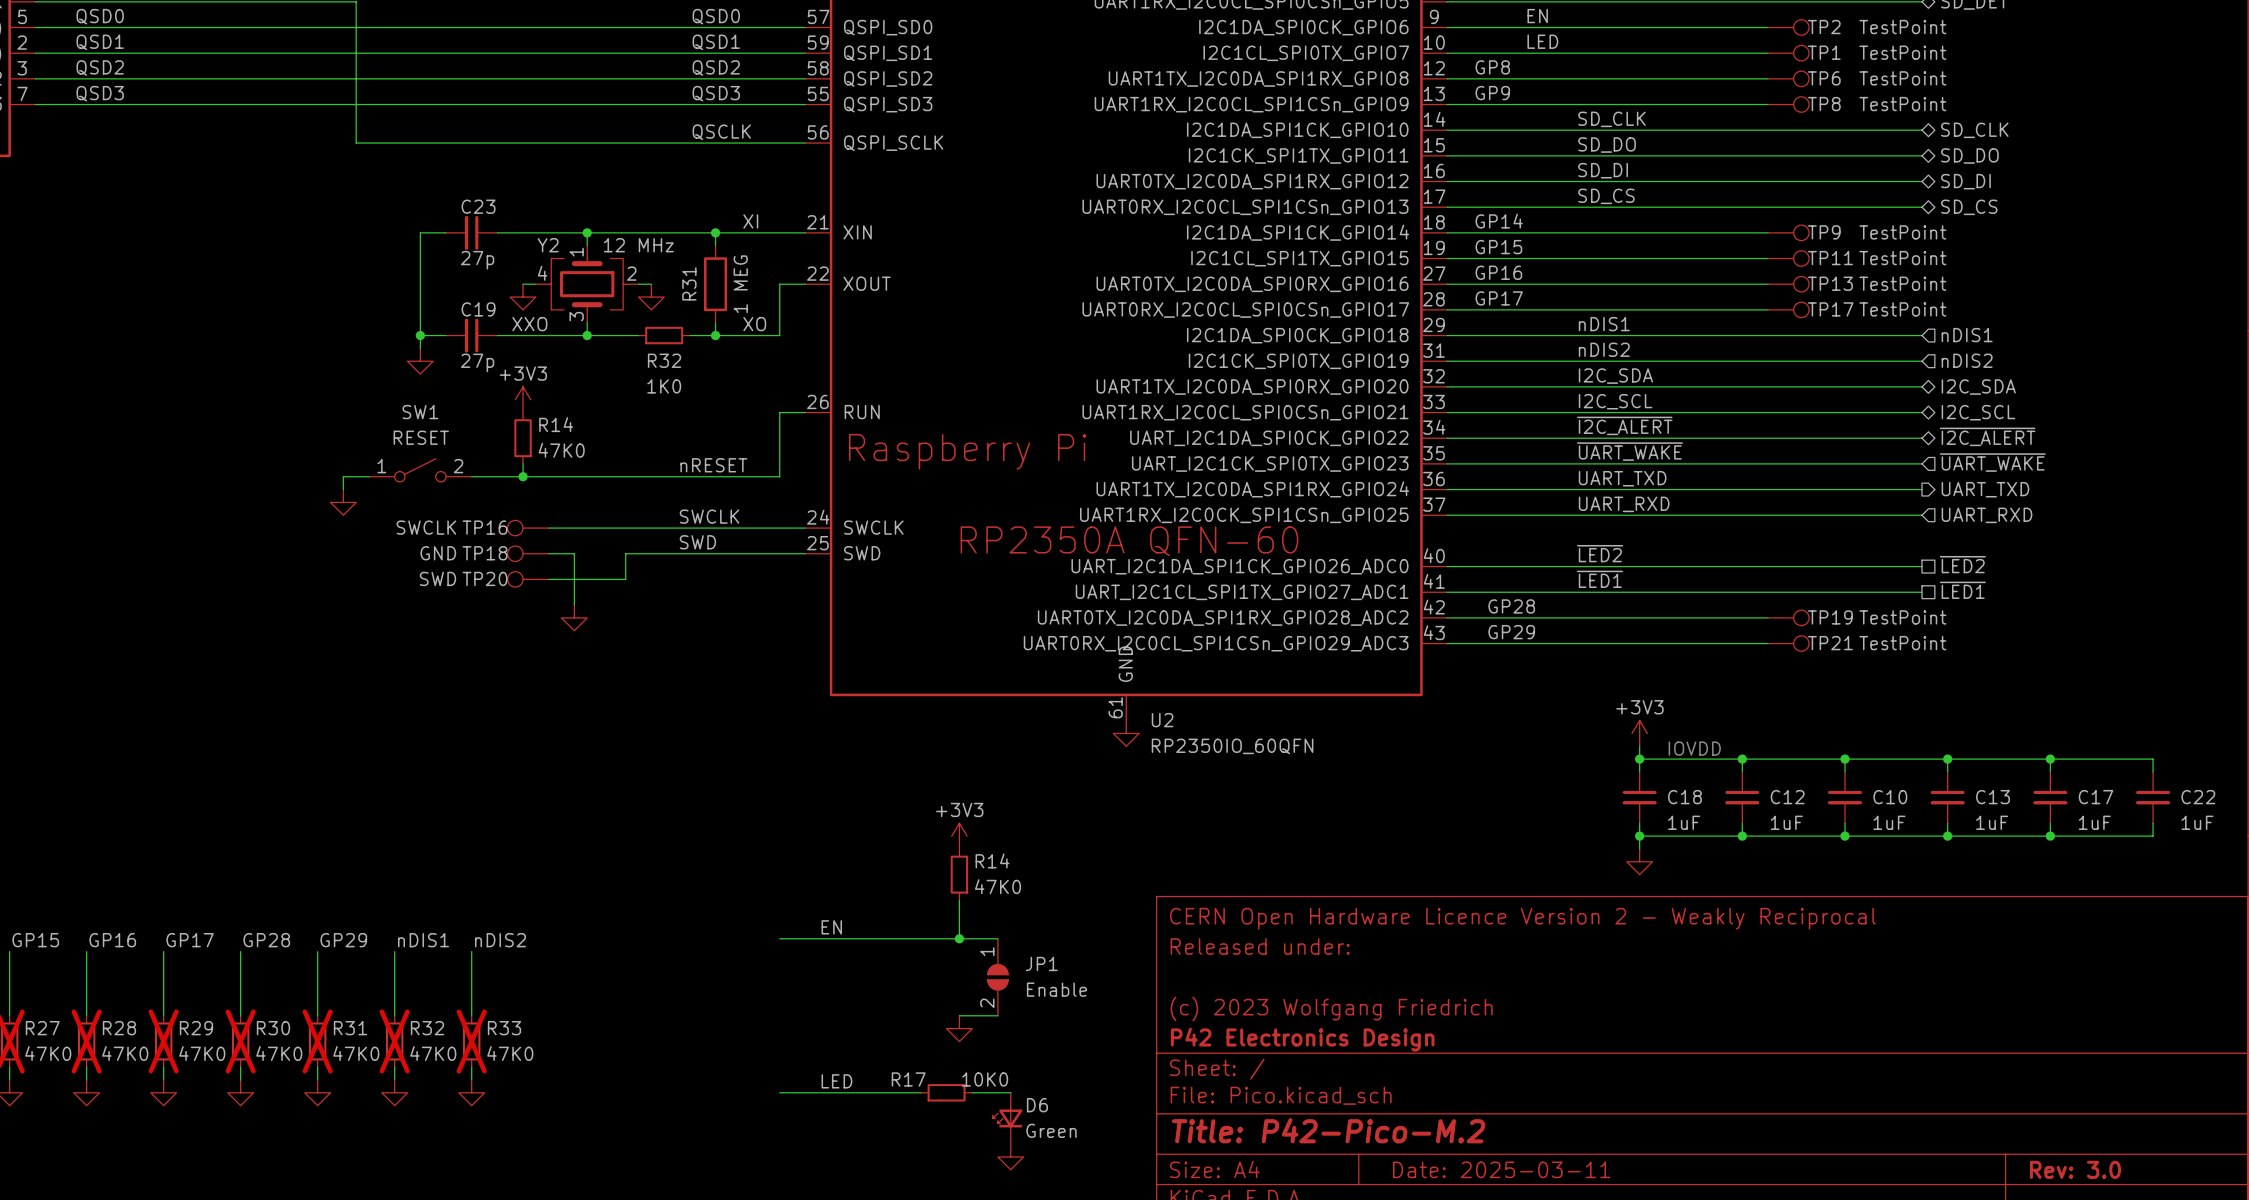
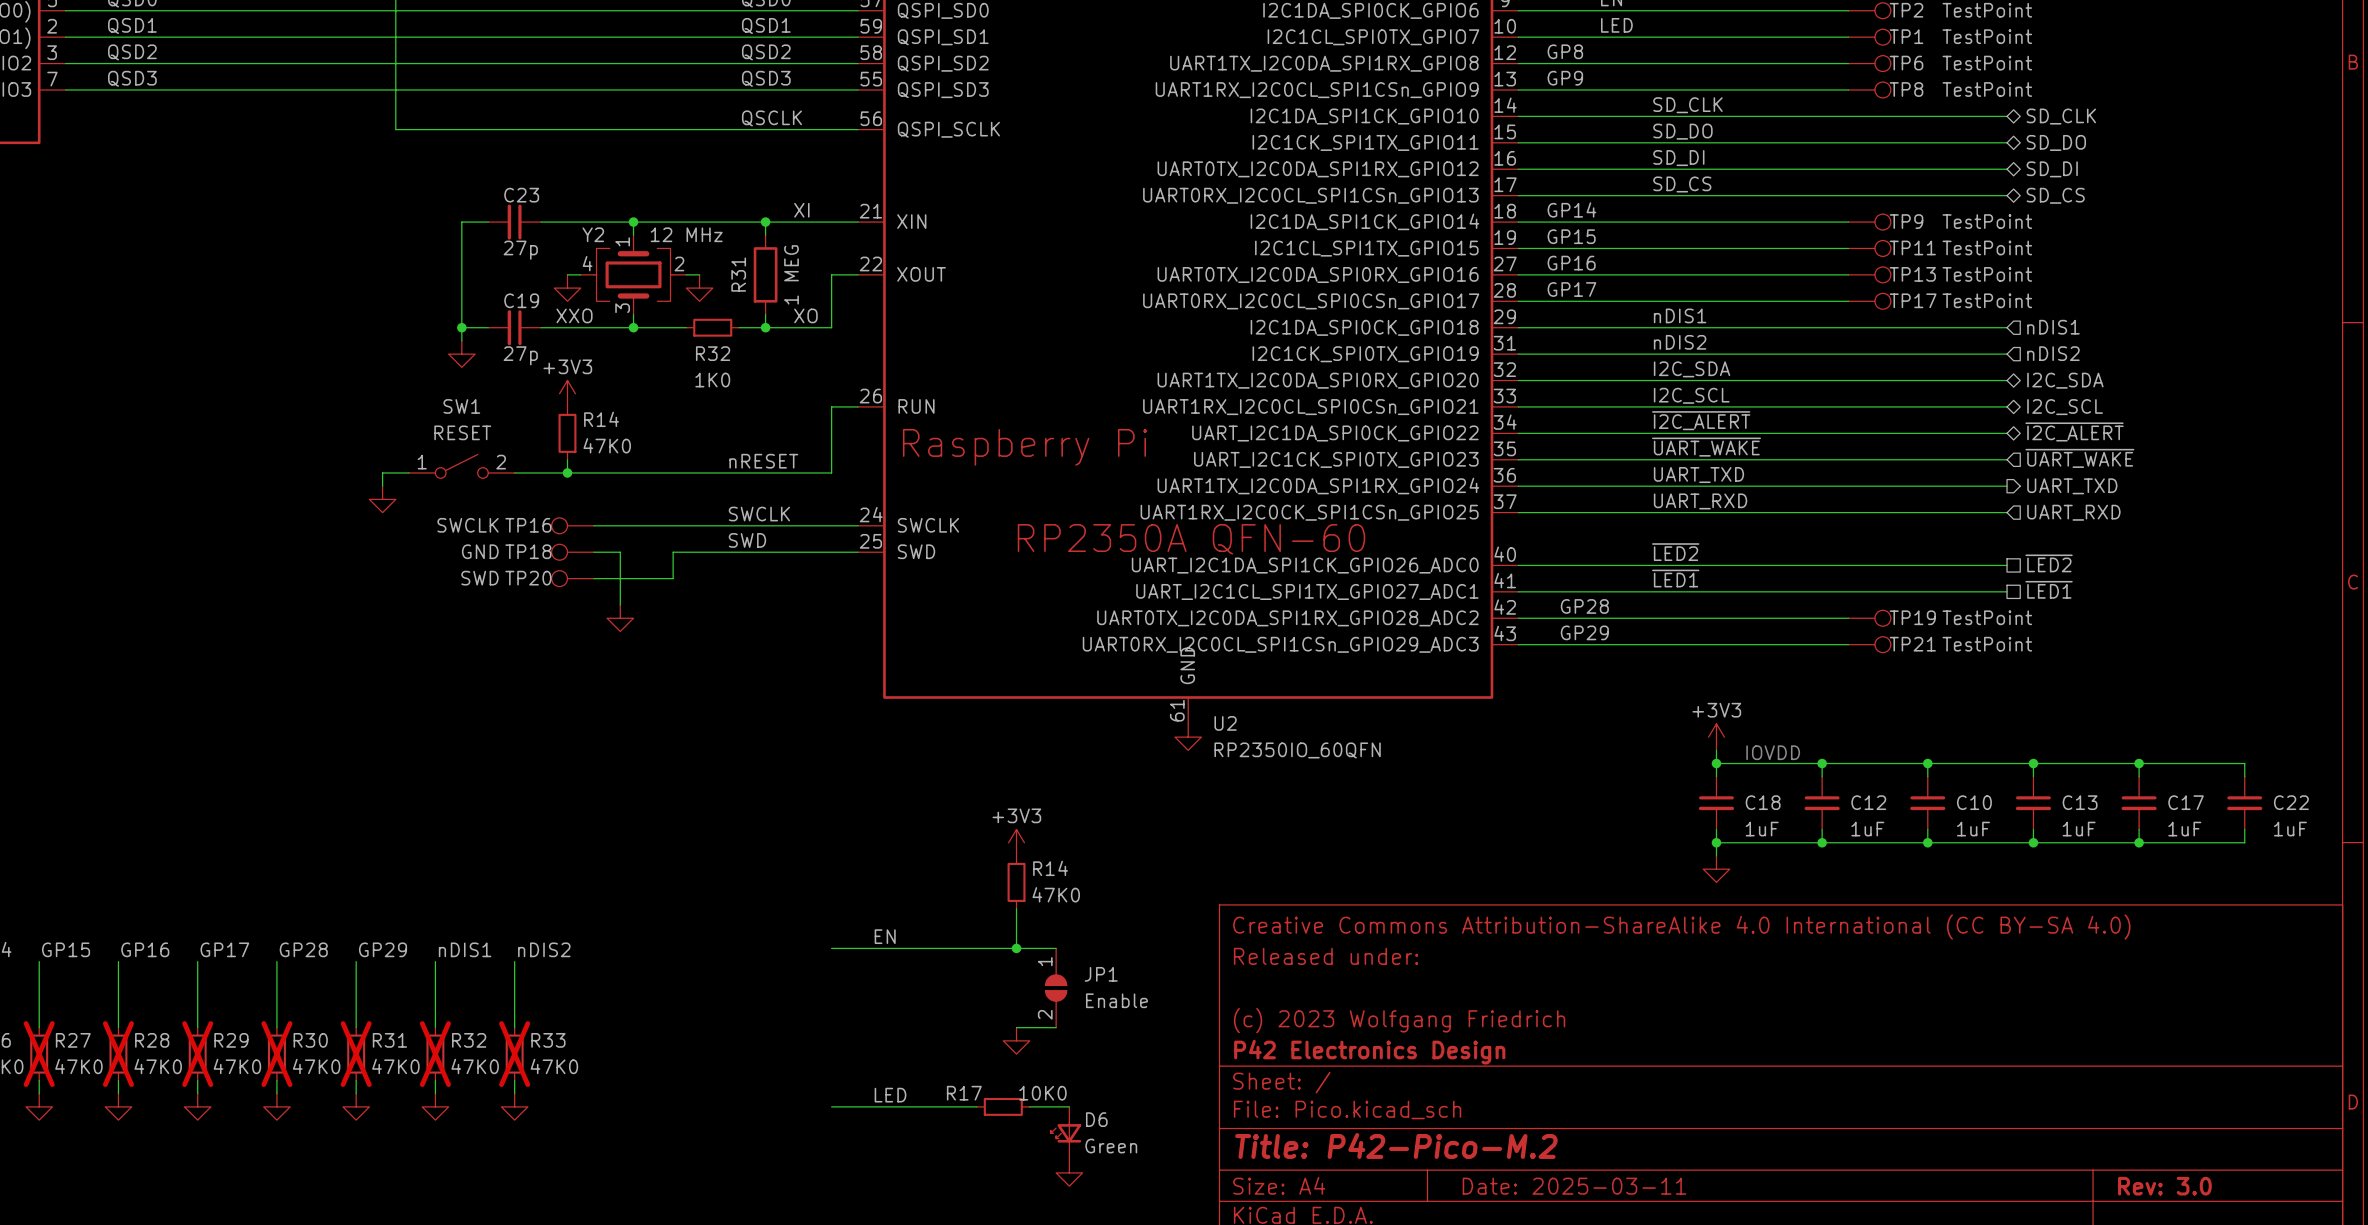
title block: CERN Open Hardware Licence Version 2 - Weakly Reciprocal (1522, 918) -> Creative Commons Attribution-ShareAlike 4.0 International (CC BY-SA 4.0) (1681, 927)

